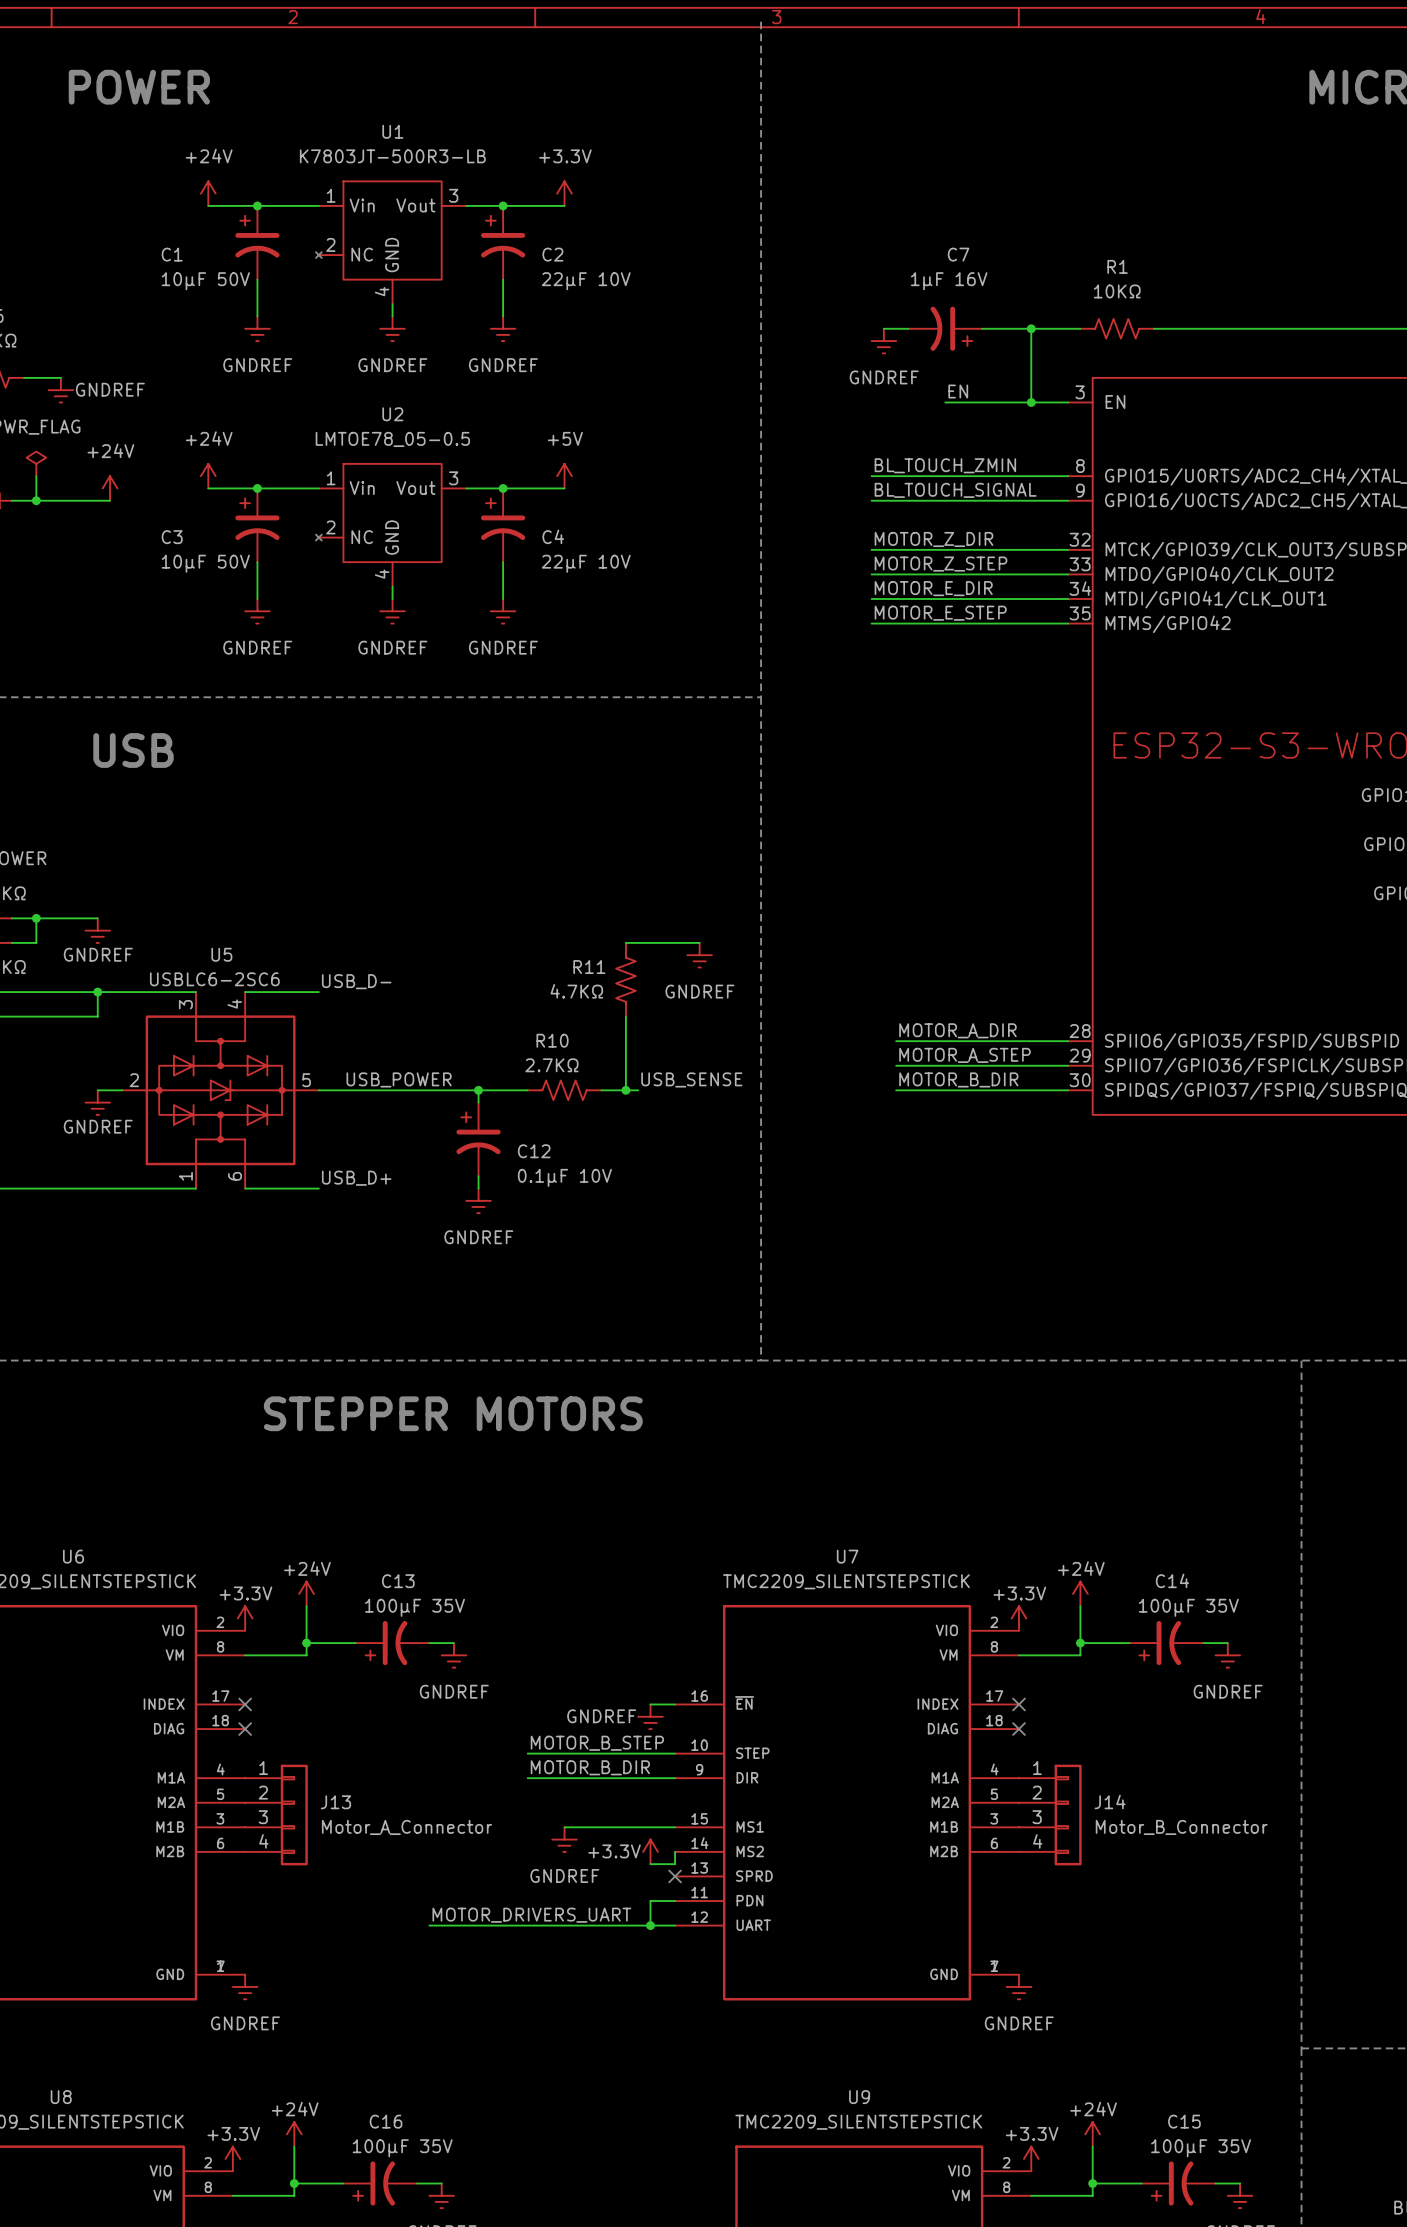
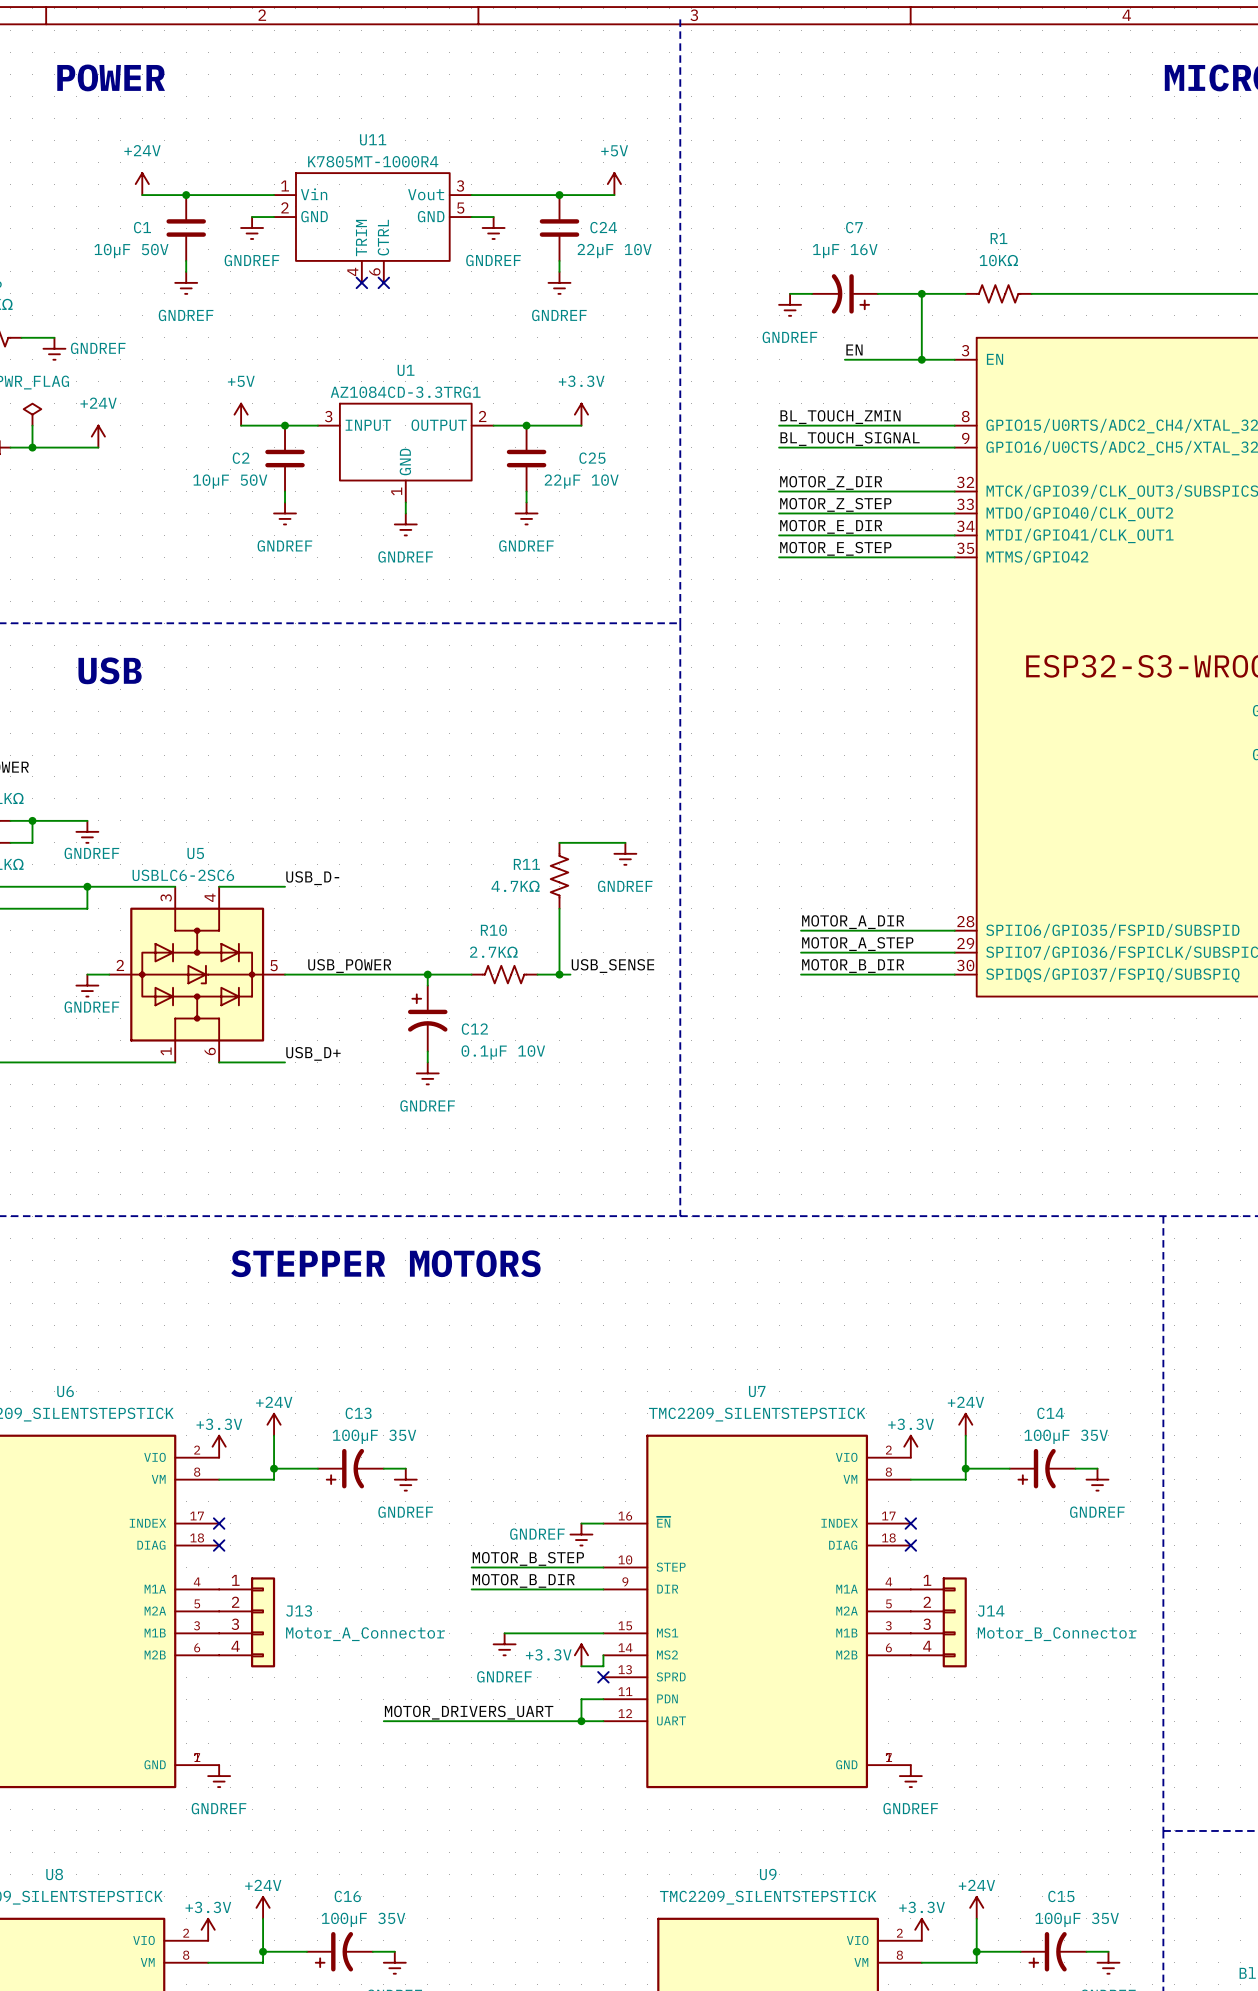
U1 value: K7803JT-500R3-LB (392, 156) -> AZ1084CD-3.3TRG1 (405, 392)
U1 symbol: [315, 181, 467, 305] -> [317, 403, 494, 503]
power symbol position: +24V (208, 193) -> +24V (142, 184)
power symbol: +3.3V (564, 193) -> none
wire: (208, 205) (318, 205) -> none
C1 symbol: [235, 205, 280, 280] -> [166, 195, 206, 261]
junction position: (257, 205) -> (186, 195)
wire: (466, 205) (564, 205) -> none
C2 symbol: [480, 205, 526, 280] -> [265, 425, 305, 492]
junction: (503, 205) -> none
power symbol: none -> +5V (614, 184)
wire: none -> (142, 195) (274, 195)
wire: none -> (471, 195) (614, 195)
junction: none -> (559, 195)
wire: none -> (252, 217) (274, 217)
wire: none -> (471, 217) (493, 217)
C1 name position: C1 (172, 254) -> C1 (142, 227)
C2 name position: C2 (552, 254) -> C2 (241, 458)
power symbol: none -> GNDREF (252, 228)
U11: none -> K7805MT-1000R4 (372, 228)
power symbol: none -> GNDREF (493, 228)
C24: none -> 22µF 10V (559, 228)
wire: (257, 279) (257, 316) -> none
wire: (503, 279) (503, 316) -> none
C1 value position: 10µF 50V (205, 281) -> 10µF 50V (131, 251)
C2 value: 22µF 10V (586, 281) -> 10µF 50V (230, 481)
wire: none -> (559, 260) (559, 271)
wire: (392, 304) (392, 316) -> (186, 260) (186, 271)
power symbol: none -> GNDREF (186, 282)
no-connect mark: none -> (361, 282)
no-connect mark: none -> (383, 282)
power symbol: none -> GNDREF (559, 282)
power symbol: GNDREF (257, 328) -> none
power symbol: GNDREF (392, 328) -> none
power symbol: GNDREF (503, 328) -> none
power symbol: none -> +5V (241, 414)
power symbol: none -> +3.3V (581, 414)
power symbol: +24V (208, 476) -> none
wire: none -> (241, 425) (317, 425)
junction: none -> (285, 425)
power symbol: +5V (564, 476) -> none
junction: none -> (526, 425)
wire: (208, 488) (318, 488) -> none
junction: (257, 488) -> none
wire: (466, 488) (564, 488) -> (493, 425) (581, 425)
junction: (503, 488) -> none
C25: none -> 22µF 10V (526, 458)
C3: 10µF 50V (257, 525) -> none
U2: LMTOE78_05-0.5 (391, 525) -> none
C4: 22µF 10V (503, 525) -> none
wire: none -> (285, 491) (285, 502)
wire: none -> (526, 491) (526, 502)
wire: (257, 562) (257, 599) -> none
wire: (503, 562) (503, 599) -> none
power symbol: none -> GNDREF (285, 513)
power symbol: none -> GNDREF (526, 513)
wire: (392, 586) (392, 599) -> (405, 502) (405, 513)
power symbol: none -> GNDREF (405, 524)
power symbol: GNDREF (257, 611) -> none
power symbol: GNDREF (392, 611) -> none
power symbol: GNDREF (503, 611) -> none

